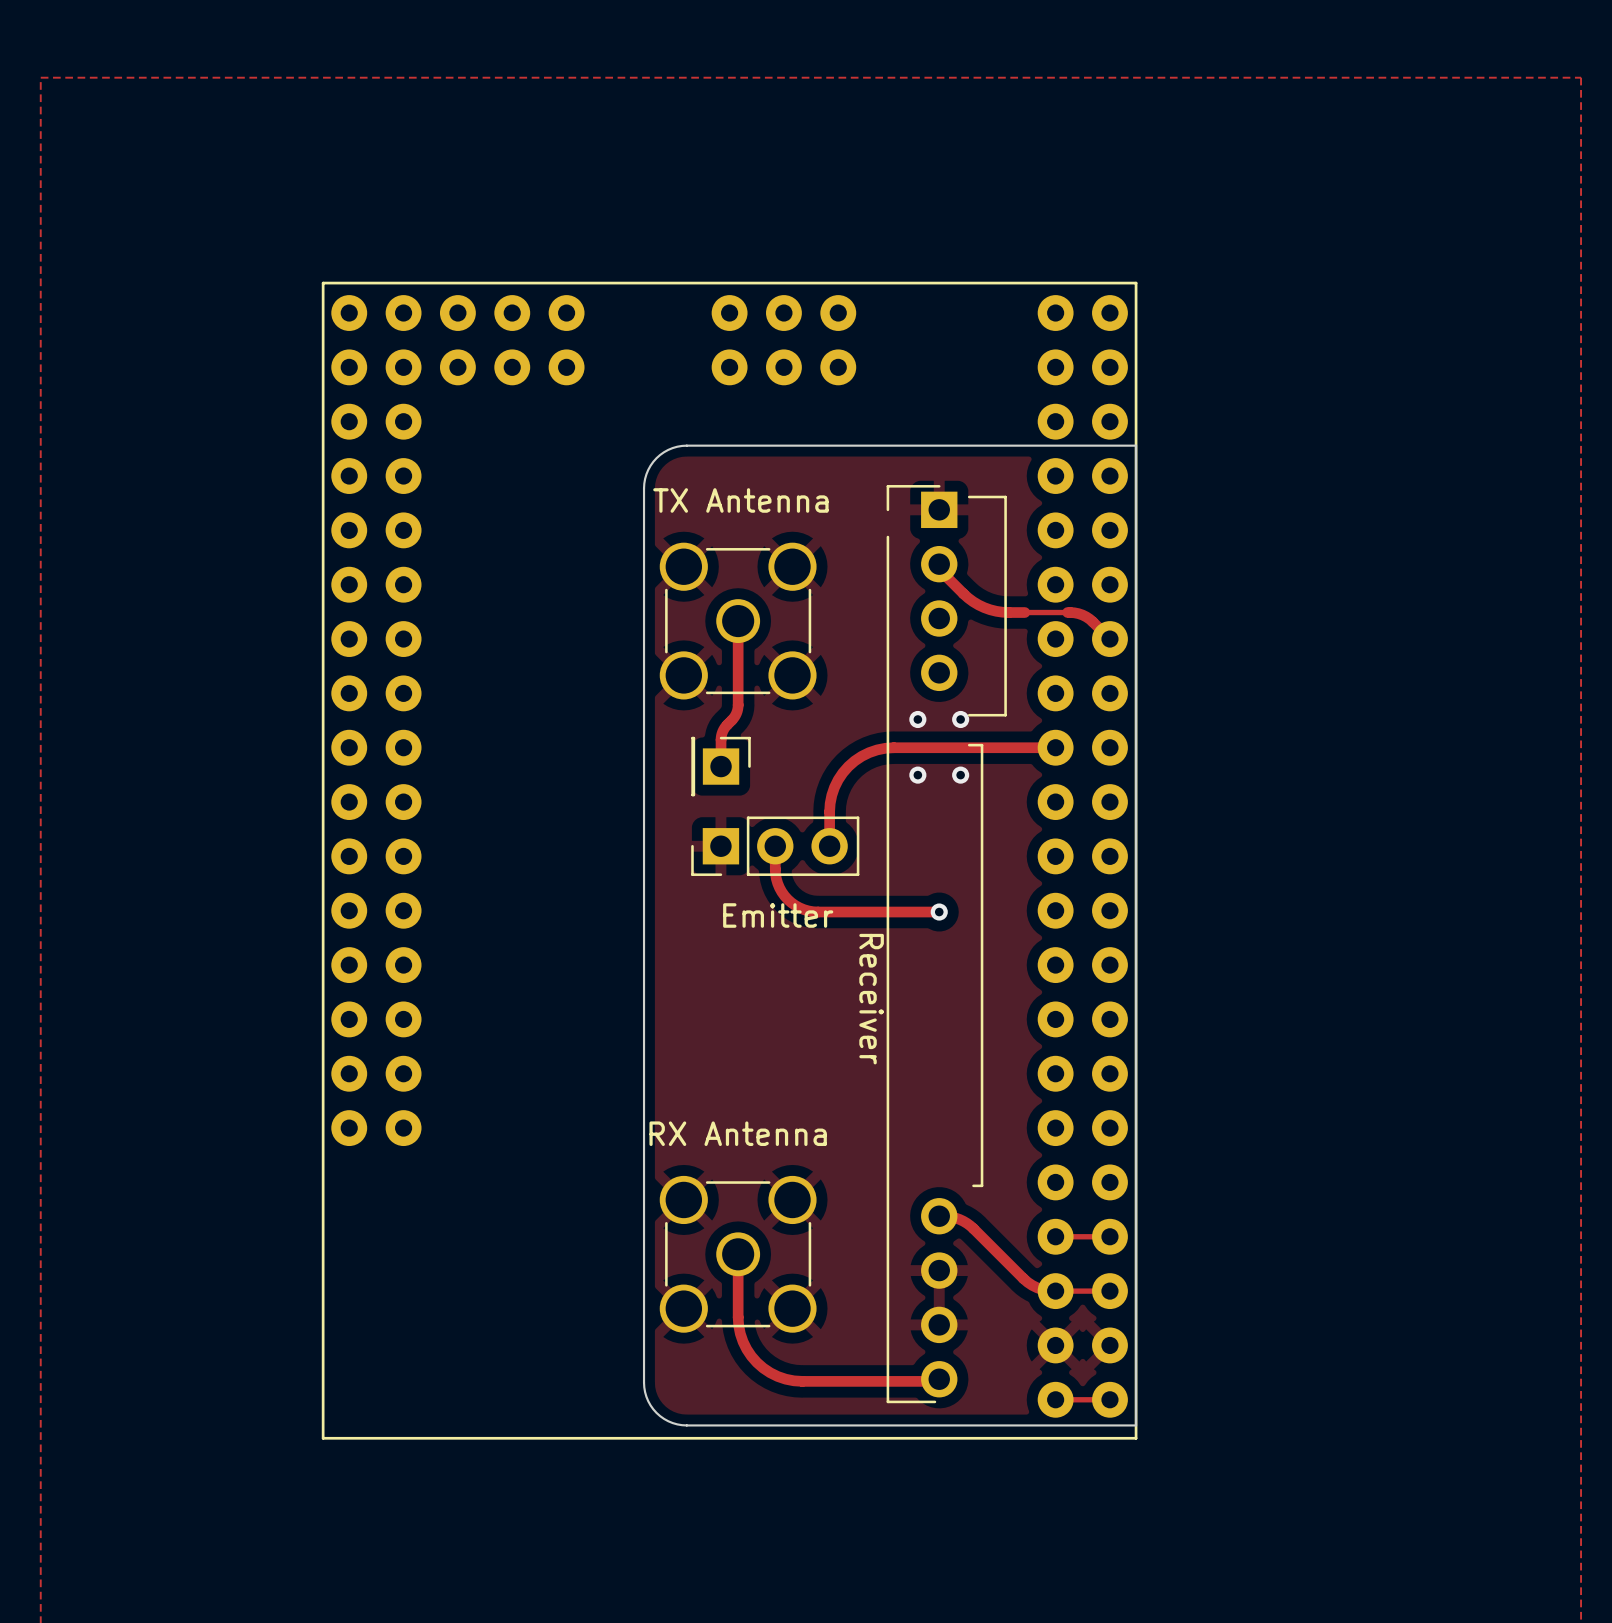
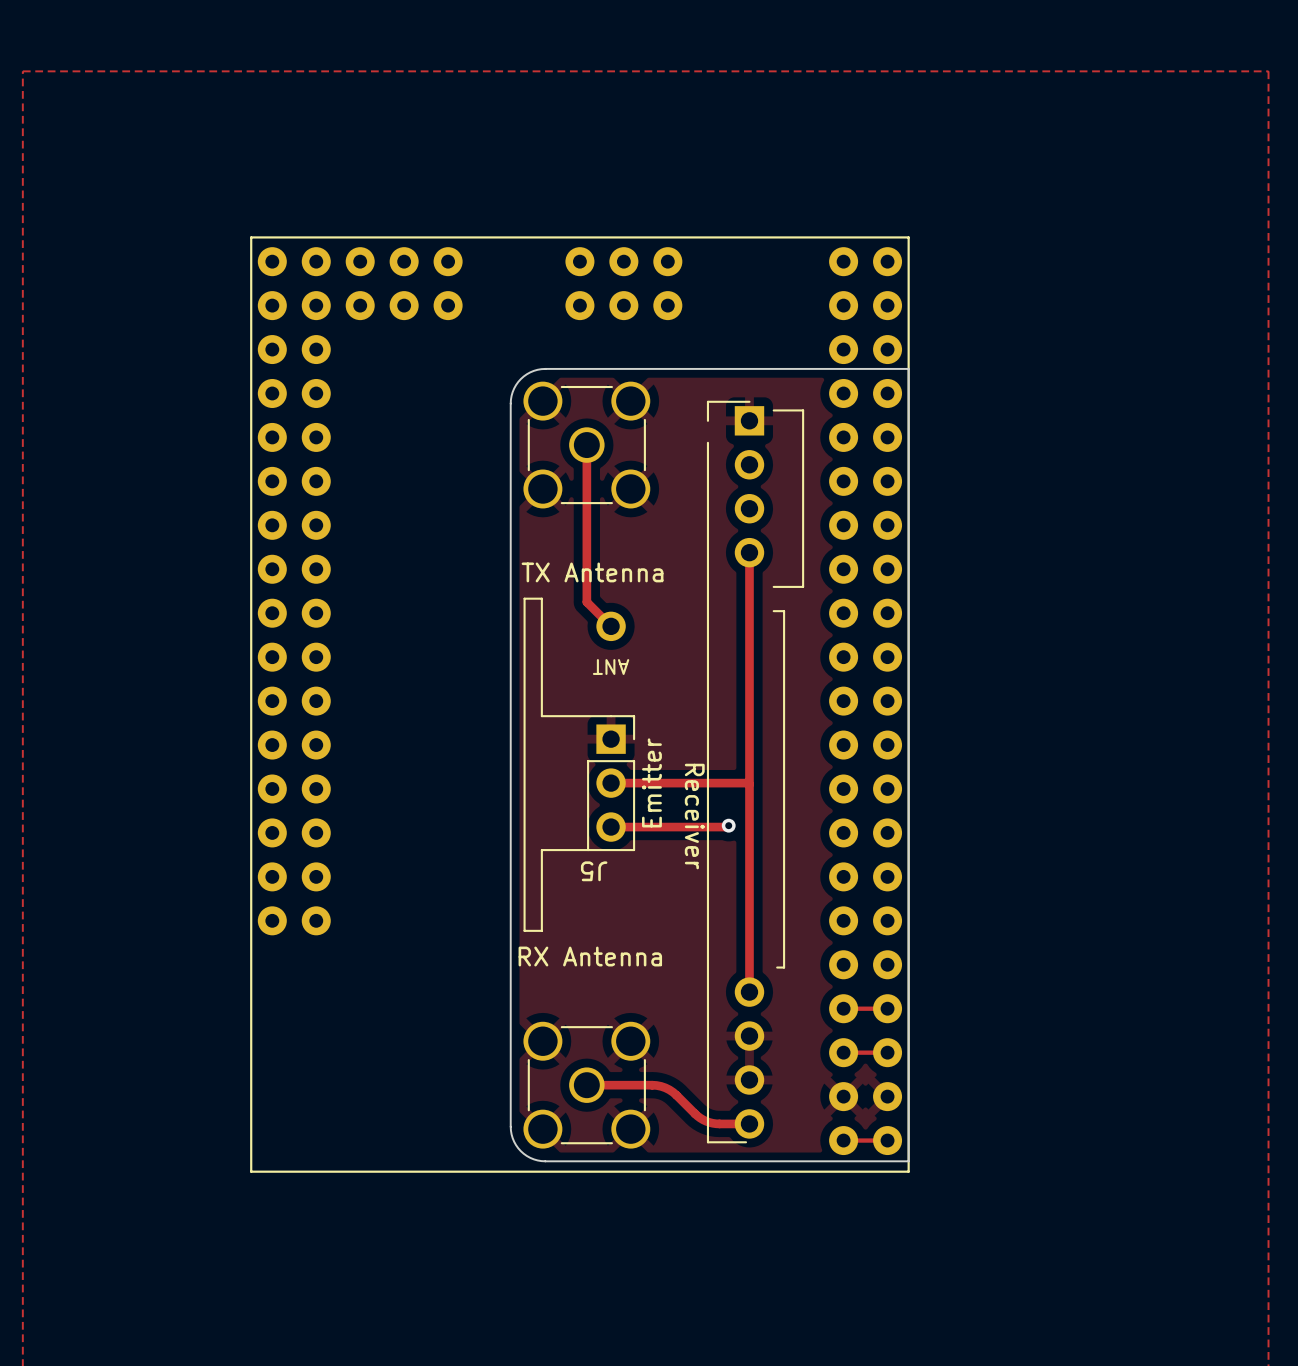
text position: TX Antenna (740, 500) -> TX Antenna (592, 572)
track: none -> (586, 445) (586, 510)
track: (936, 566) (968, 597) (984, 607) (1002, 612) (1078, 613) (1089, 619) (1109, 639) -> none
part position: (738, 621) -> (586, 445)
track: (738, 705) (735, 715) (721, 733) (721, 766) -> (586, 578) (586, 602) (611, 626)
via: (917, 719) -> none
via: (960, 719) -> none
track: (1055, 747) (893, 747) (869, 752) (848, 766) (834, 787) (830, 803) (829, 846) (828, 847) -> none
part: (721, 766) -> none
via: (917, 775) -> none
via: (960, 775) -> none
track: (775, 846) (775, 874) (779, 887) (791, 902) (803, 909) (818, 912) (939, 912) -> none
part: (775, 846) -> none
via position: (939, 912) -> (728, 825)
text rotation: 0° (778, 915) -> 90° counterclockwise (651, 782)
J5: none -> (579, 764)
track: none -> (611, 783) (749, 784)
track: none -> (728, 825) (611, 827)
text position: RX Antenna (738, 1133) -> RX Antenna (590, 956)
track: (939, 1216) (955, 1218) (967, 1223) (1027, 1282) (1042, 1289) (1055, 1291) -> (749, 992) (749, 552)
track: (738, 1254) (738, 1317) (740, 1333) (751, 1356) (770, 1372) (785, 1379) (802, 1381) (937, 1381) -> none
part position: (738, 1254) -> (586, 1085)
track: none -> (586, 1085) (661, 1086) (673, 1092) (697, 1116) (706, 1121) (716, 1123) (749, 1123)

